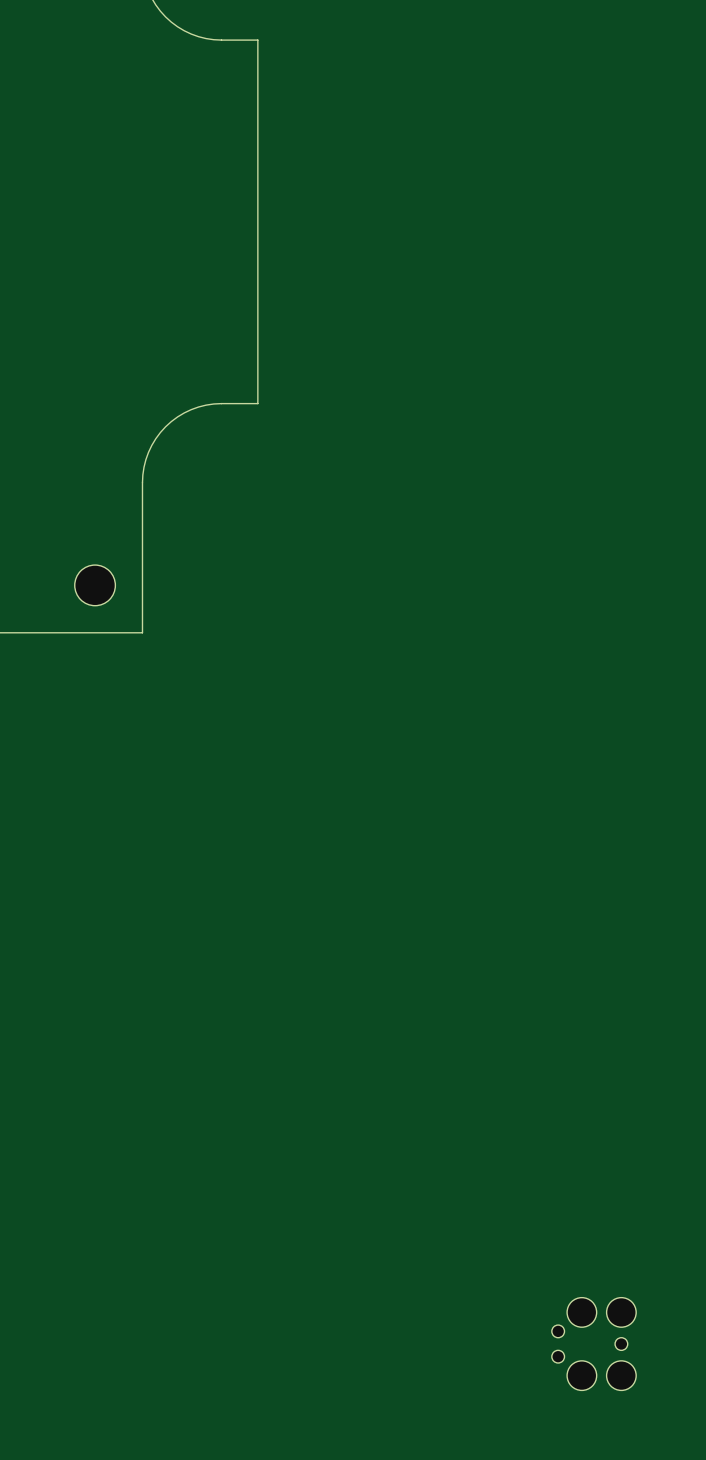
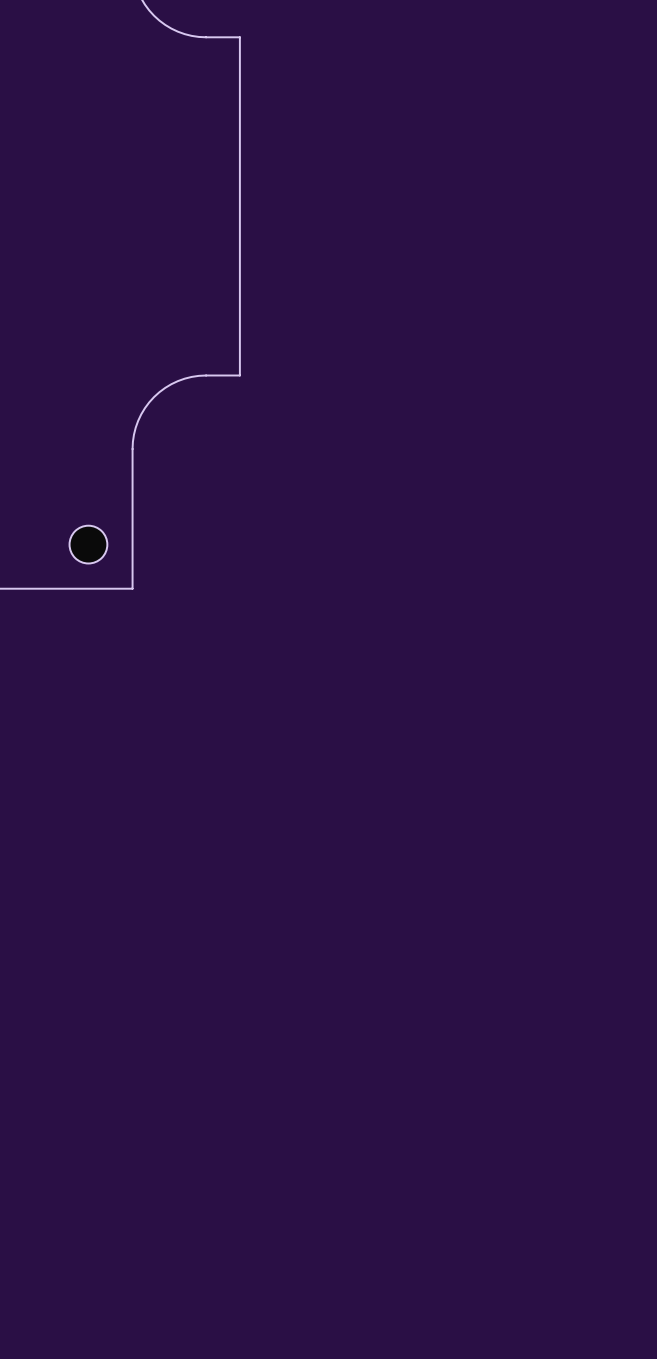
part: (594, 1344) -> none

